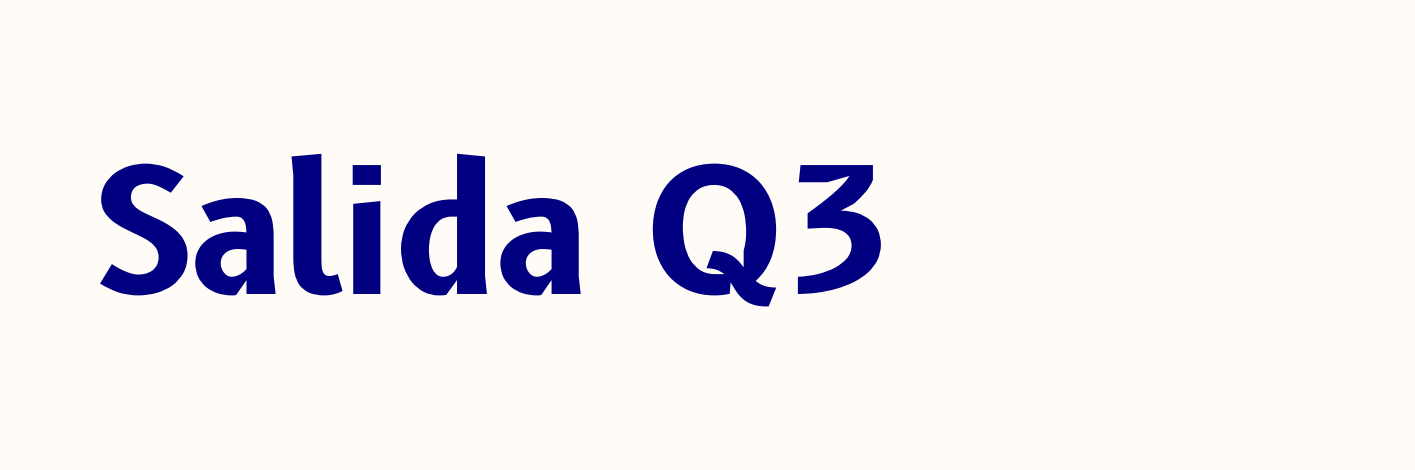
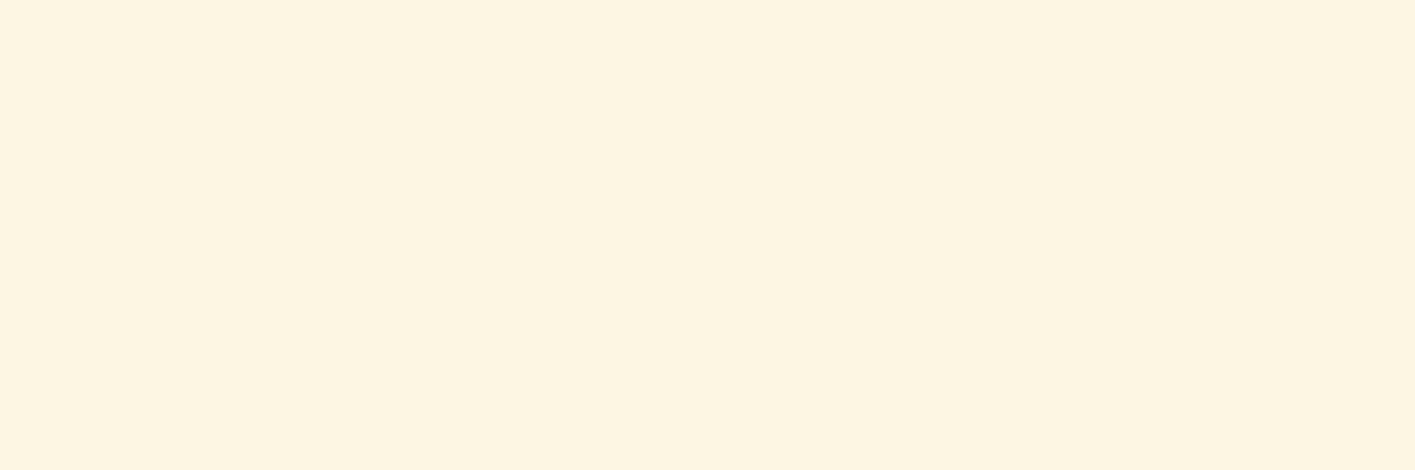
text: Salida Q3 (490, 230) -> none

